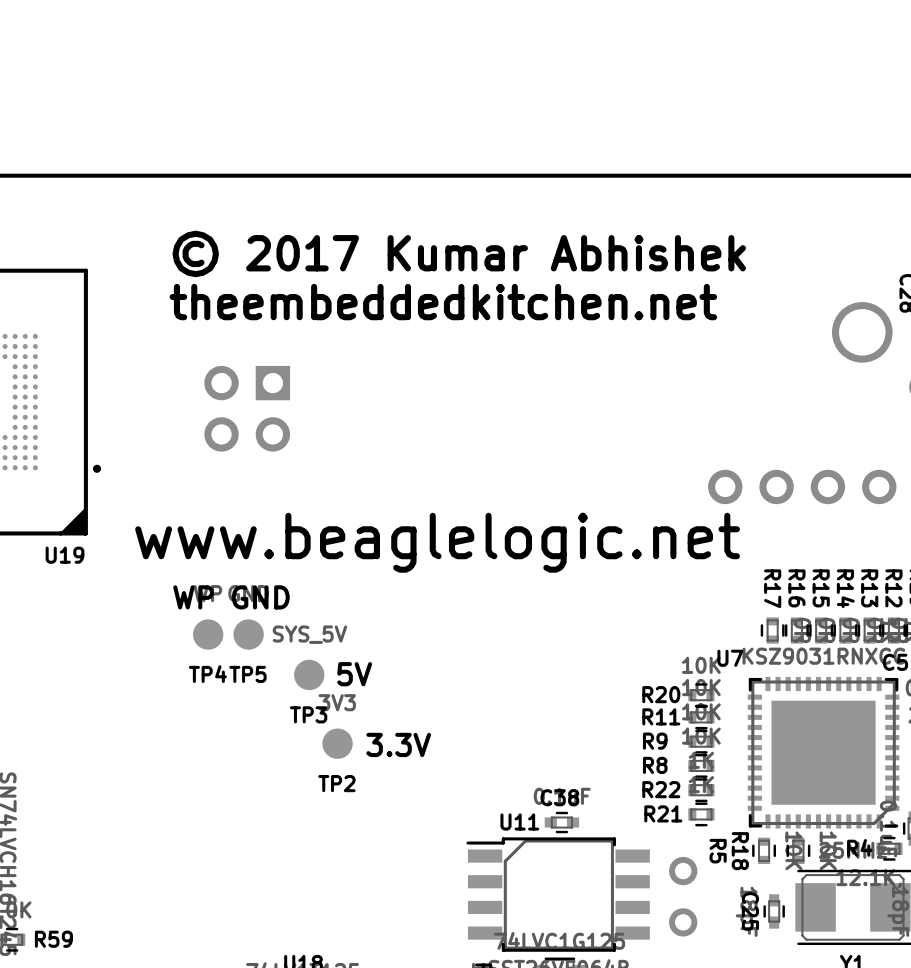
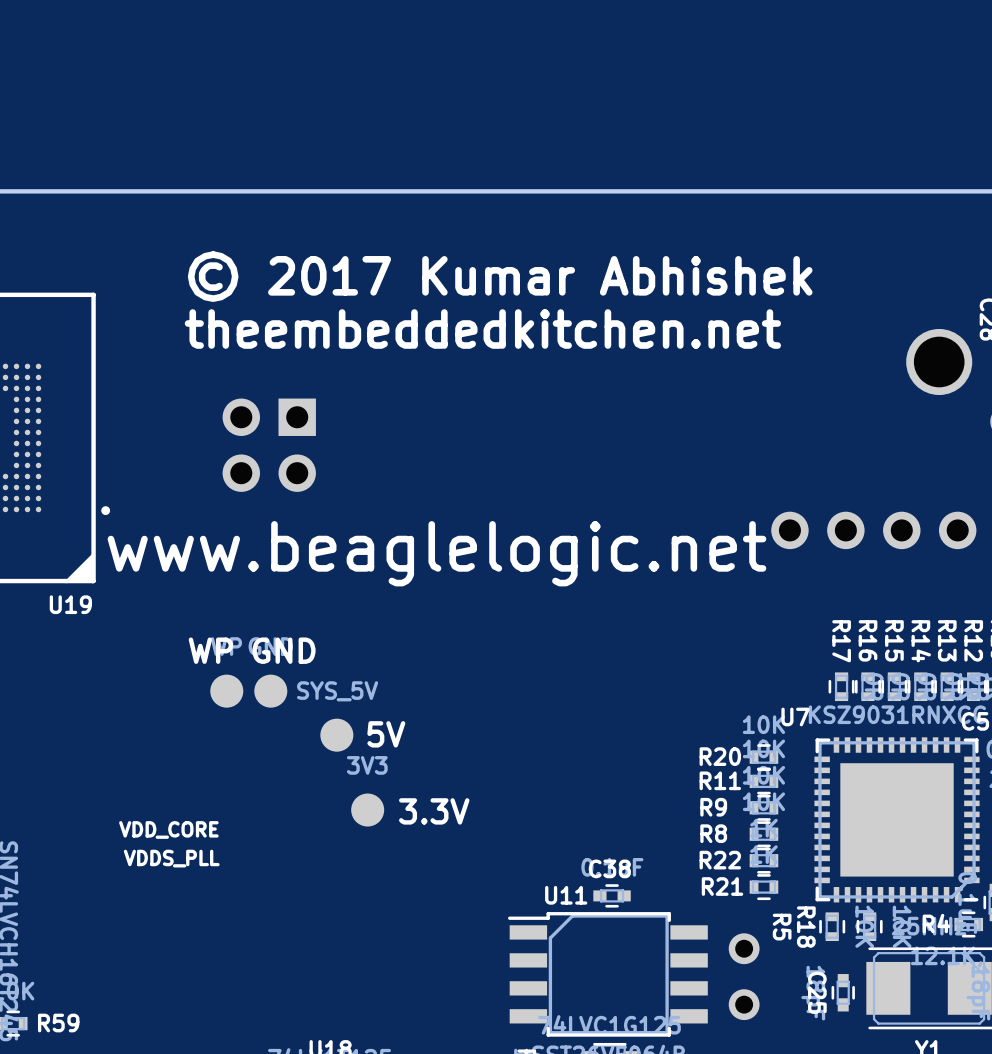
text position: www.beaglelogic.net (437, 542) -> www.beaglelogic.net (436, 553)
TP4 name: TP4 (207, 674) -> none
TP5 name: TP5 (247, 674) -> none
TP3 name: TP3 (308, 714) -> none
text: none -> VDD_CORE (168, 829)
TP2 name: TP2 (336, 783) -> none
text: none -> VDDS_PLL (171, 858)

